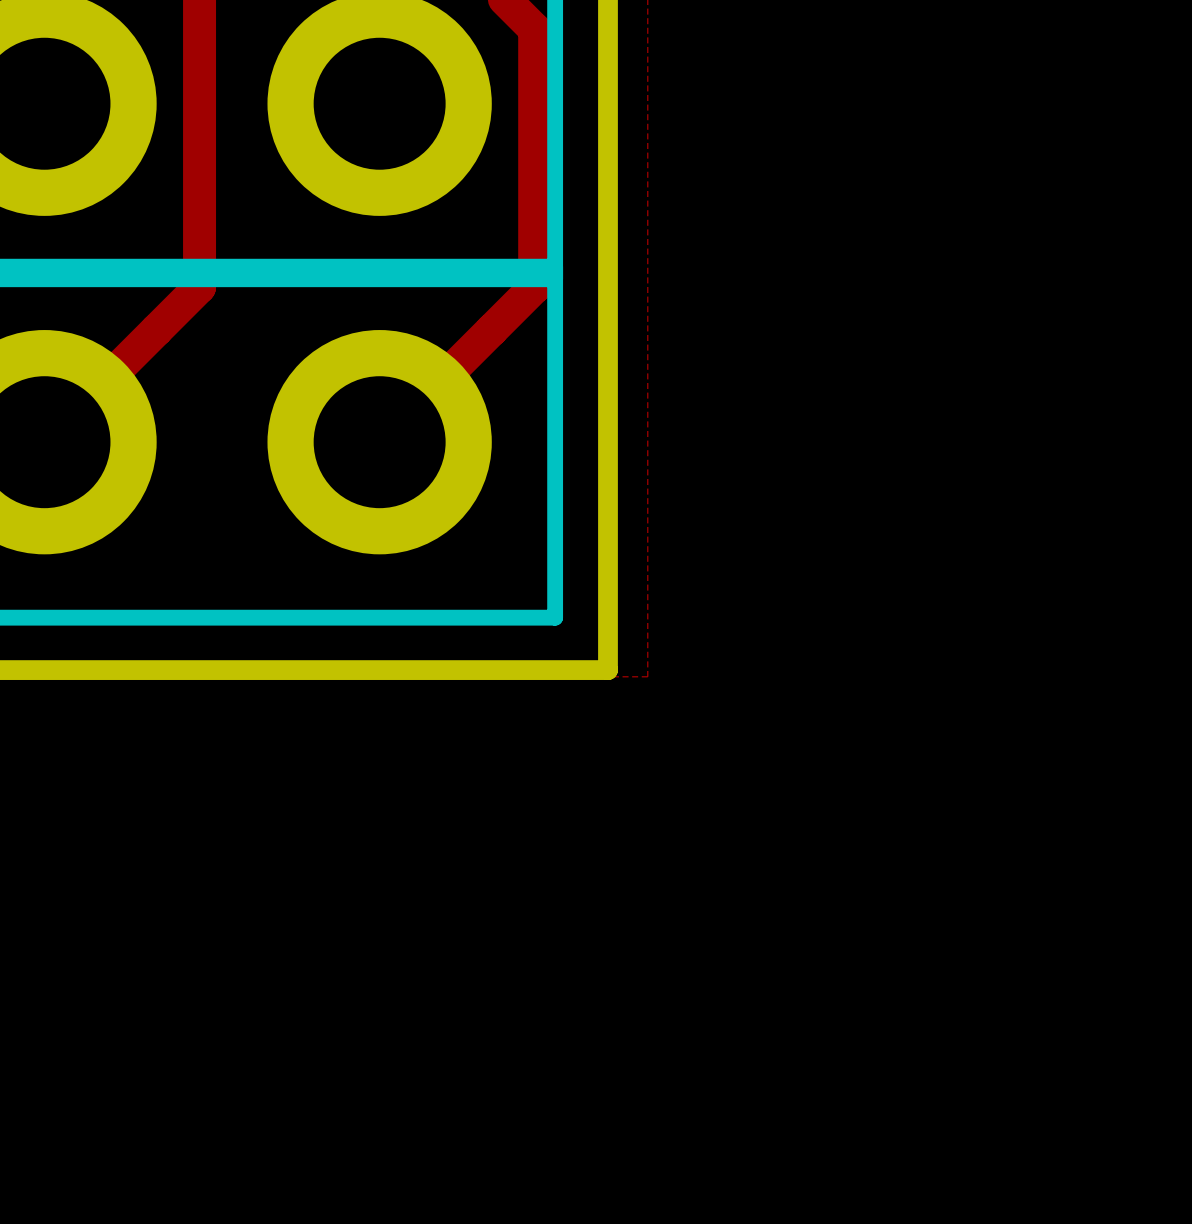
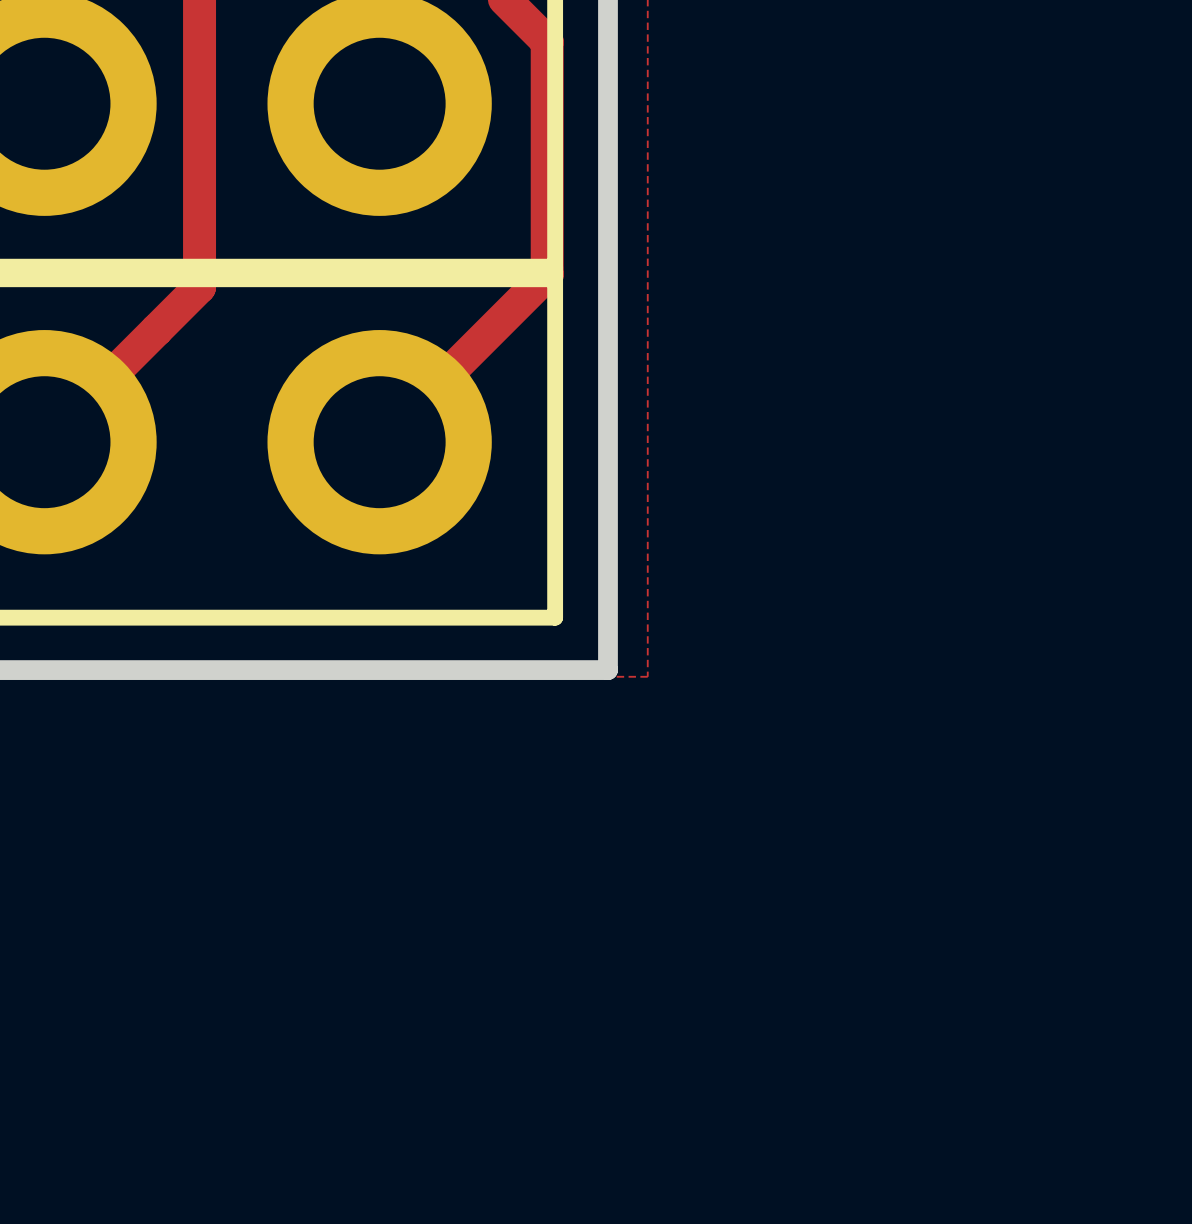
track: (534, 29) (534, 287) -> (534, 29) (547, 41) (547, 274) (534, 287)

